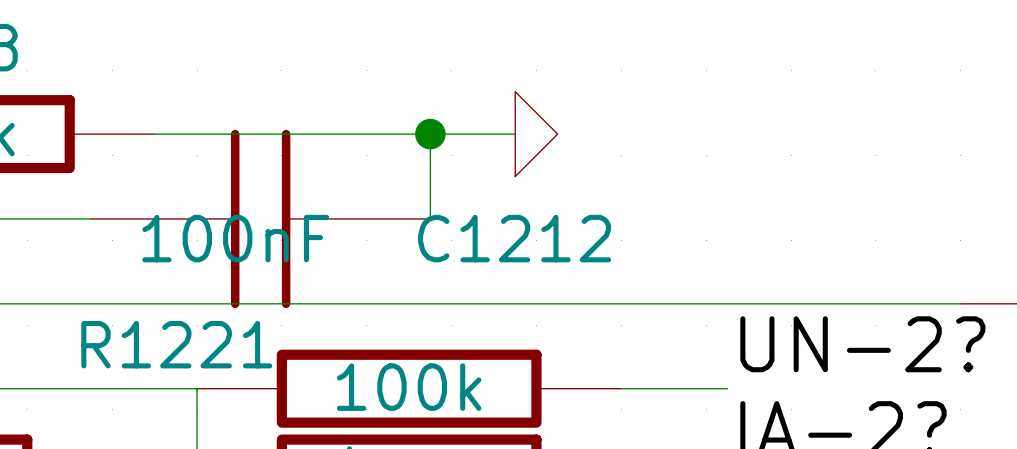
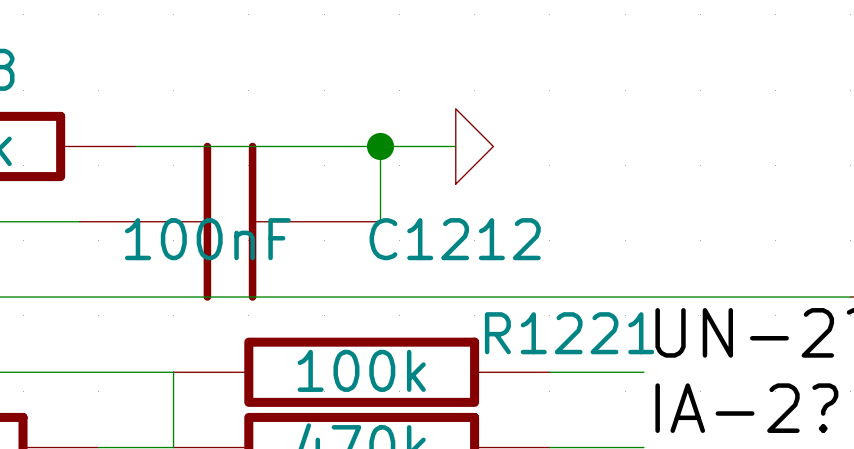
R1221 name position: R1221 (176, 344) -> R1221 (569, 333)

